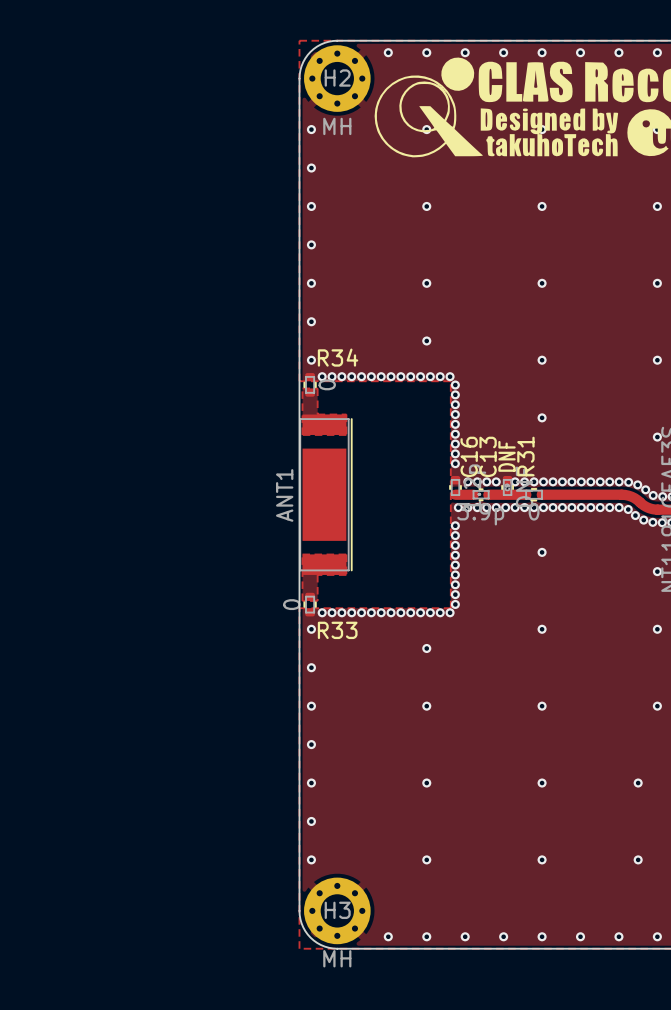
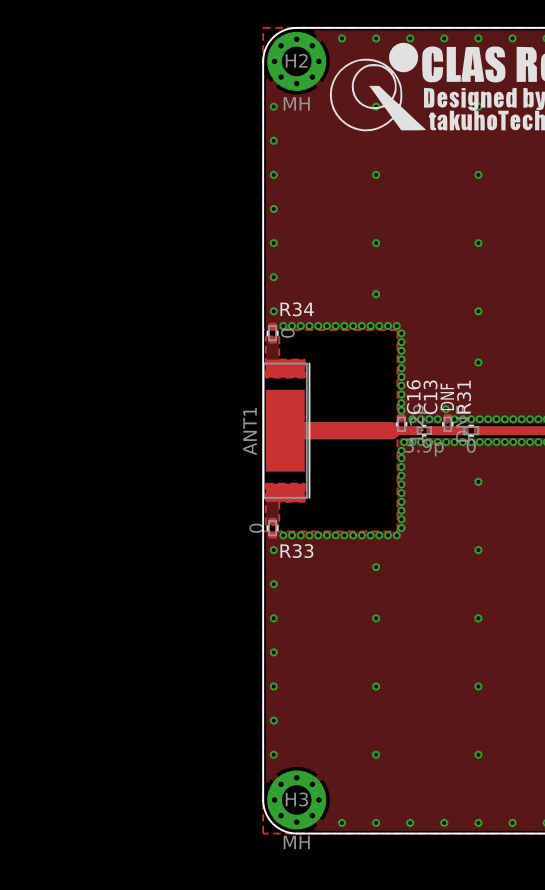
via: none -> (445, 409)
via: none -> (401, 410)
track: none -> (285, 430) (401, 430)
via: none -> (401, 450)

